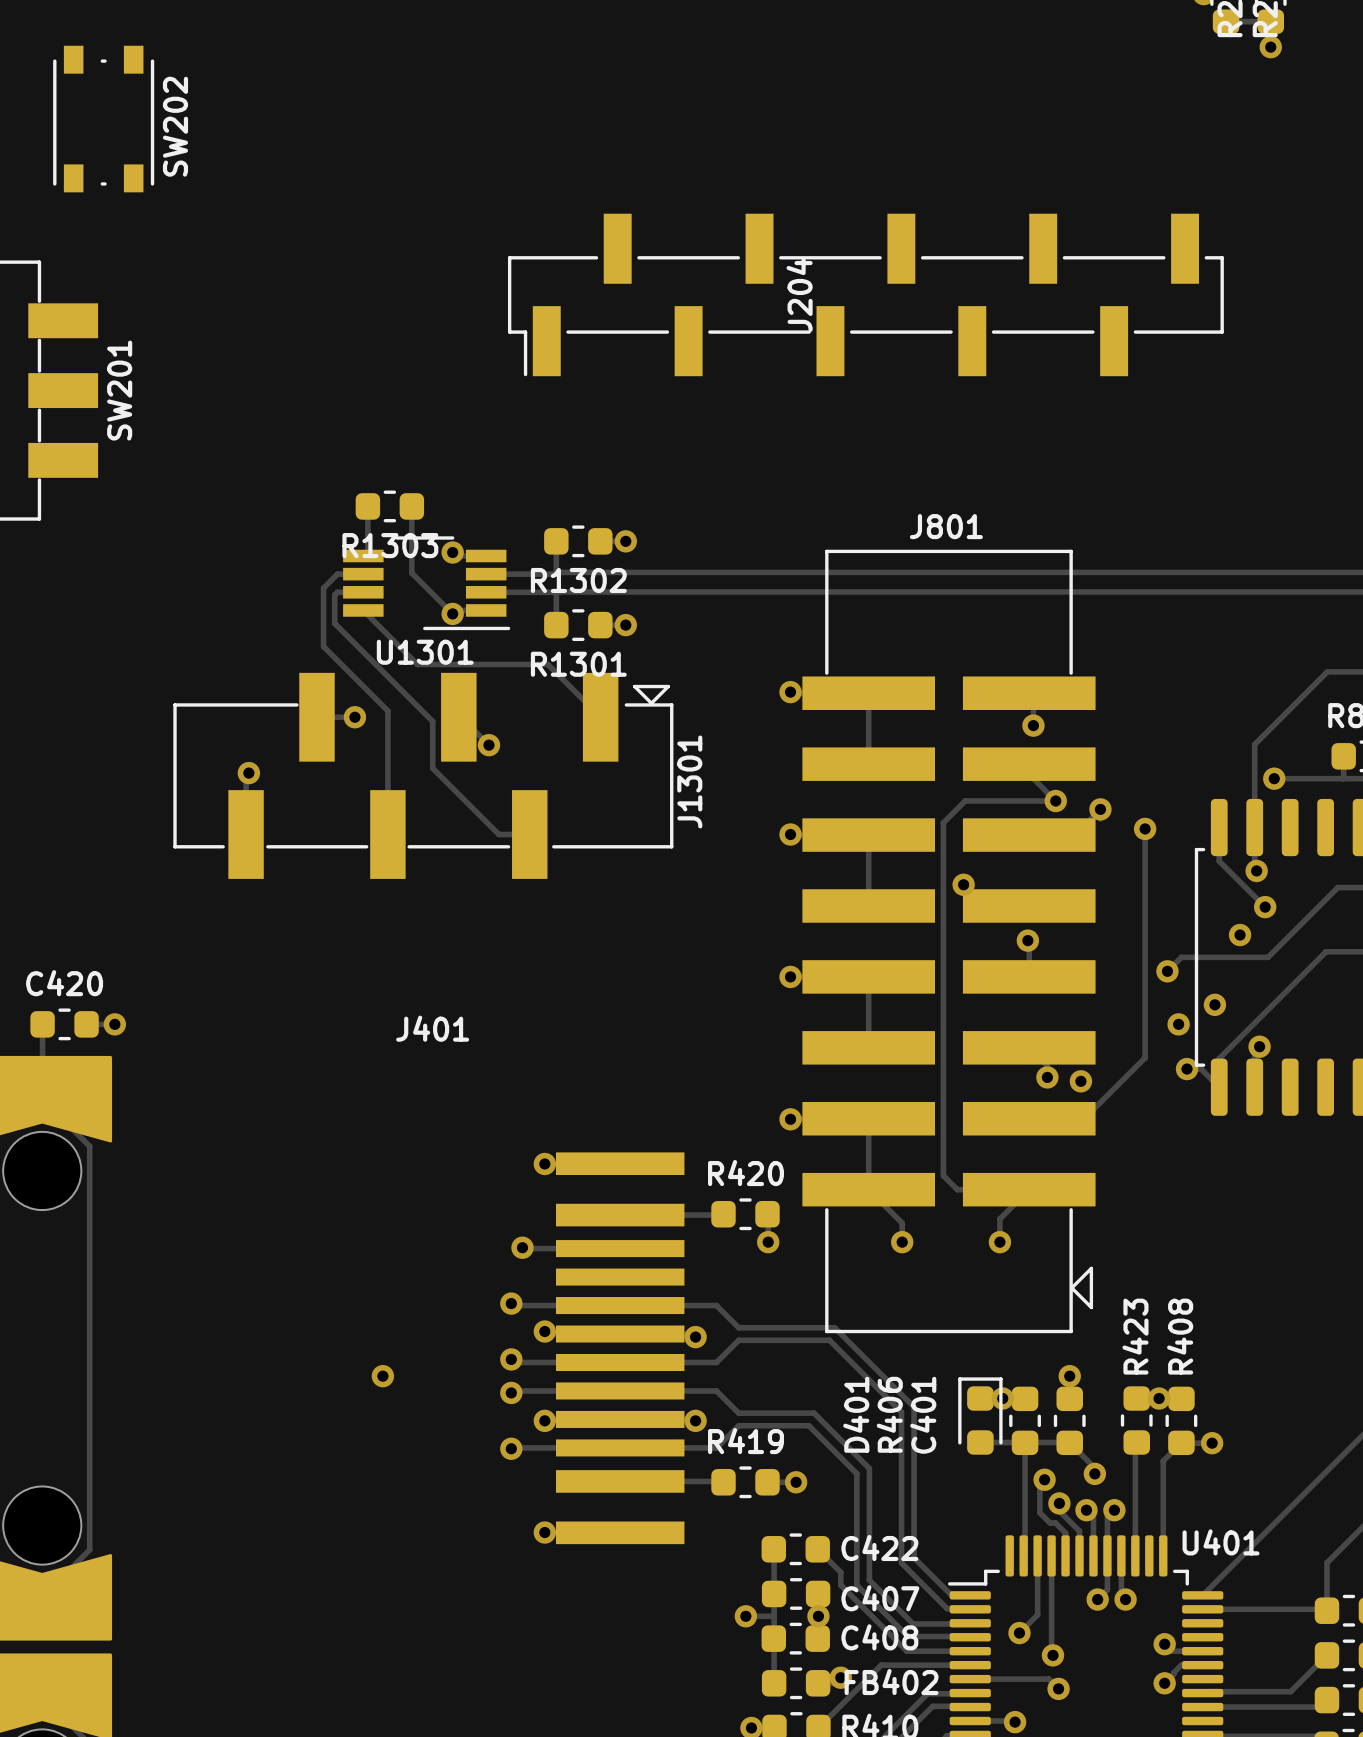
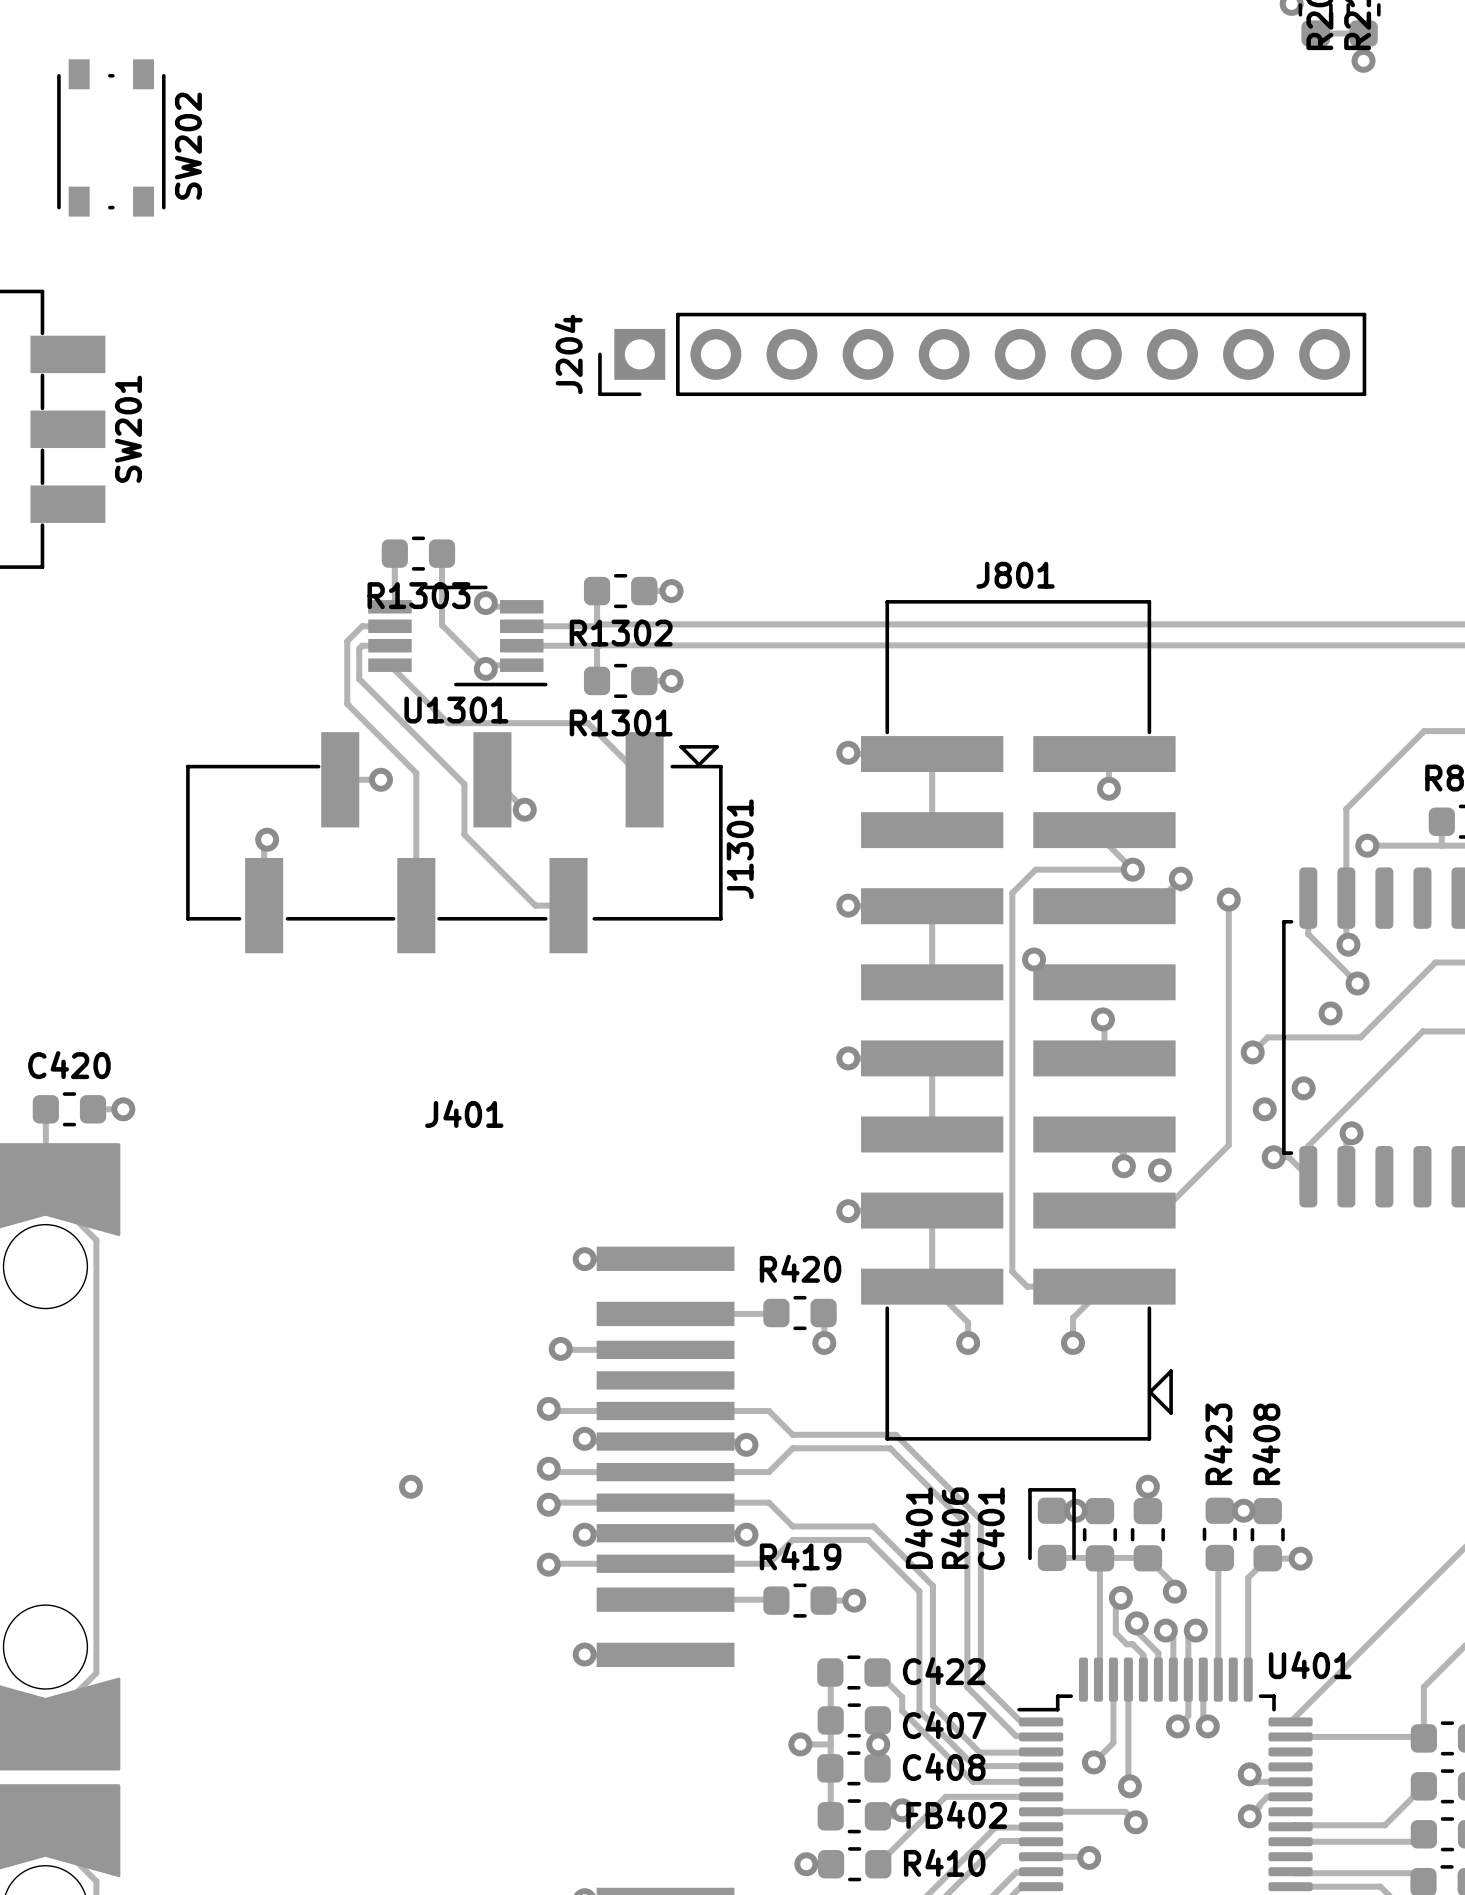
J204 footprint: [507, 213, 1224, 377] -> [598, 312, 1367, 397]
J204 name position: J204 (799, 294) -> J204 (568, 354)

